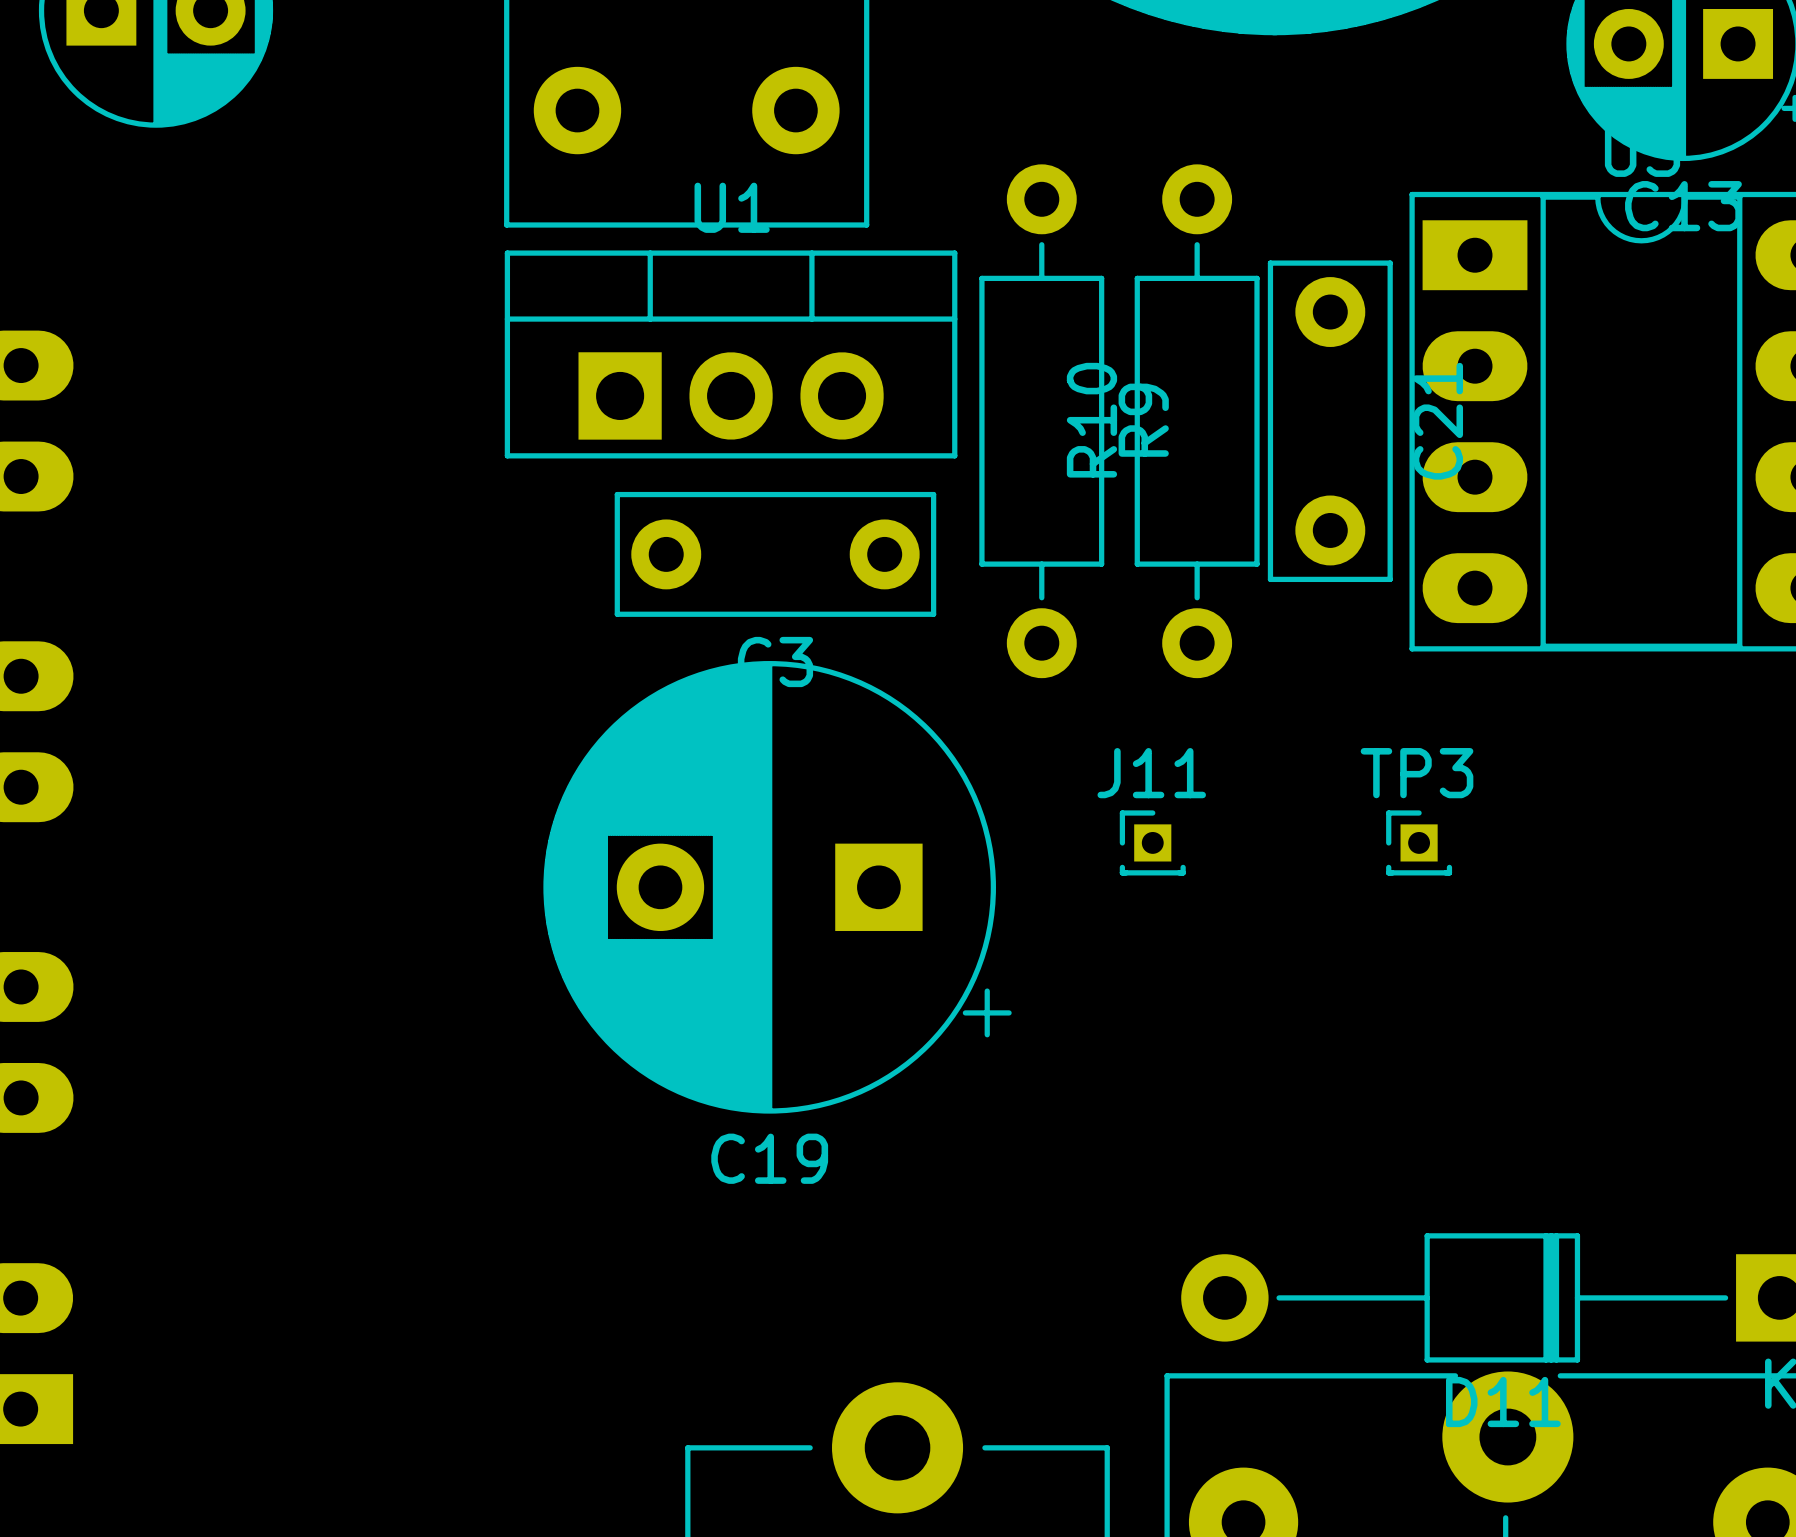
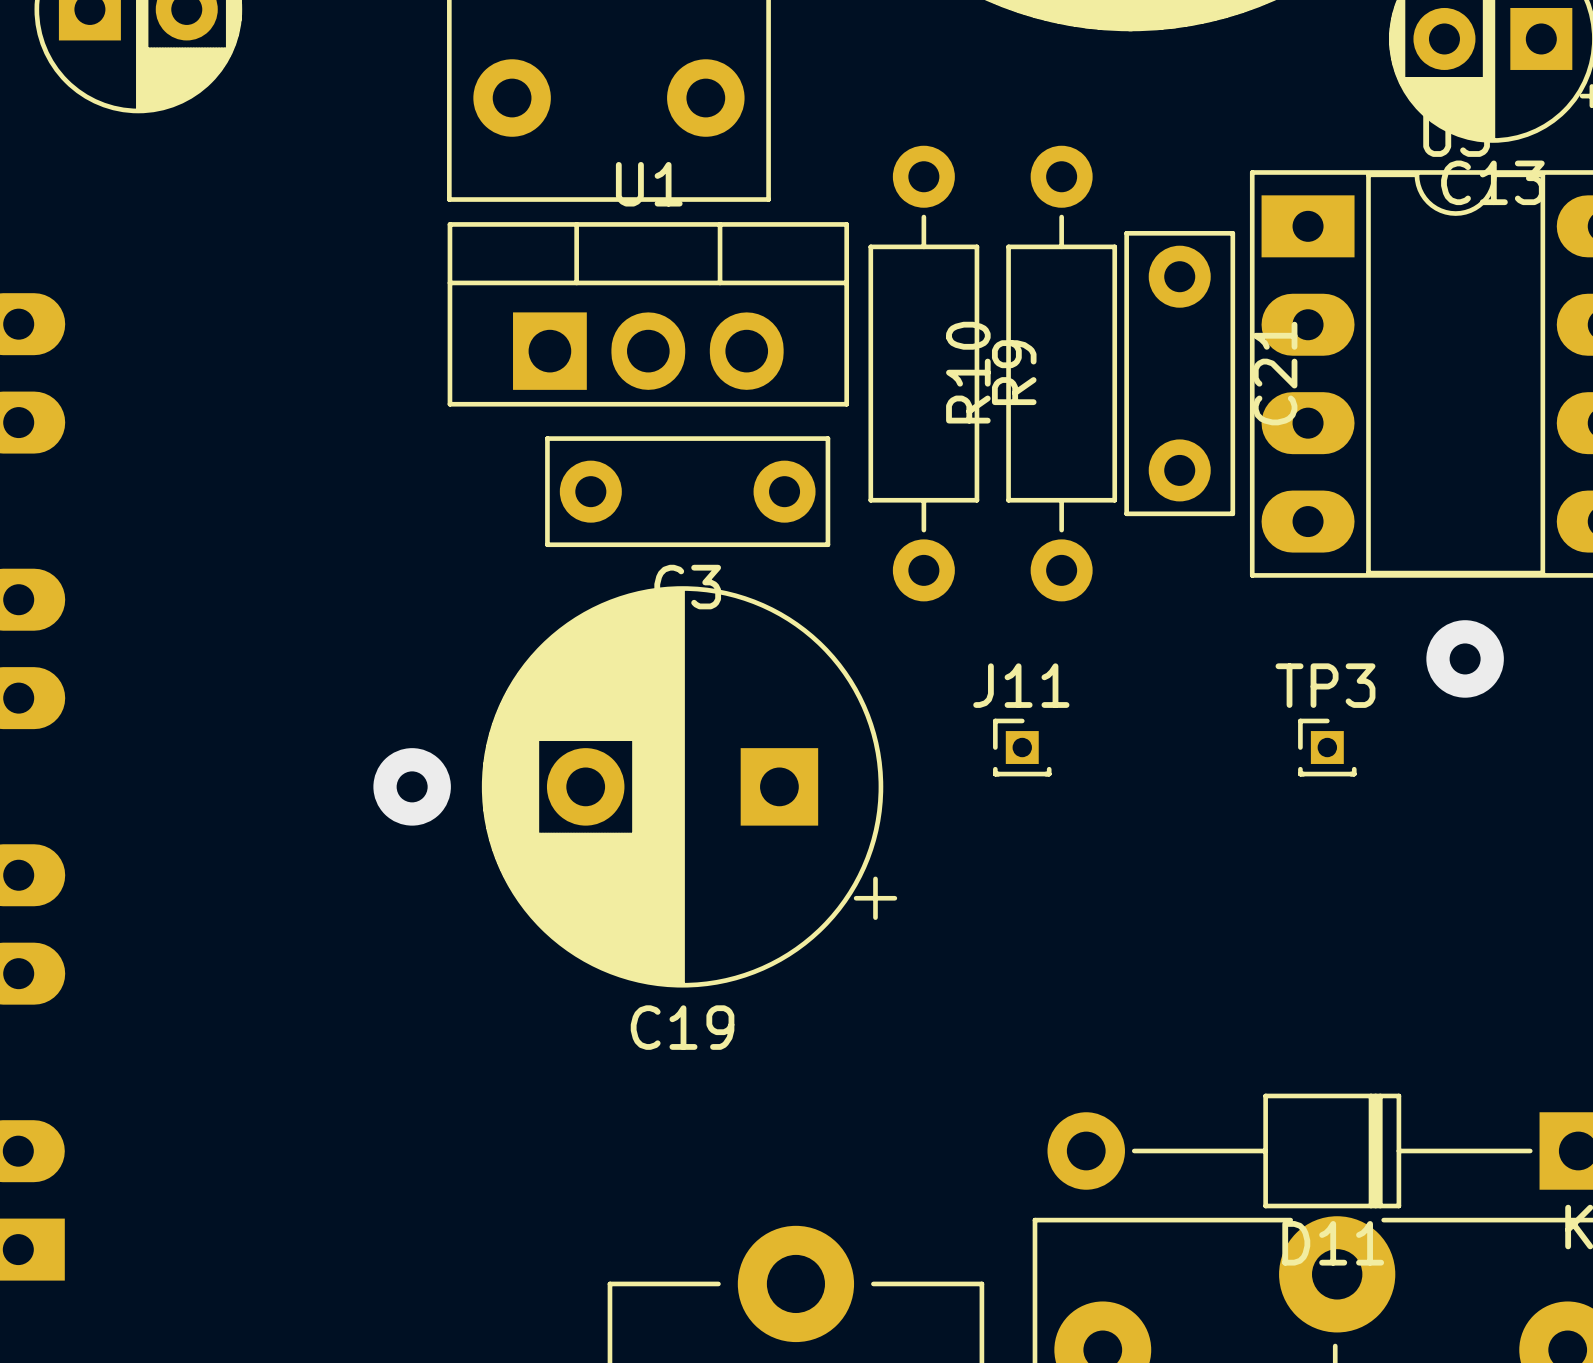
via: none -> (1465, 658)
TP3 position: (1419, 842) -> (1327, 747)
via: none -> (412, 786)

